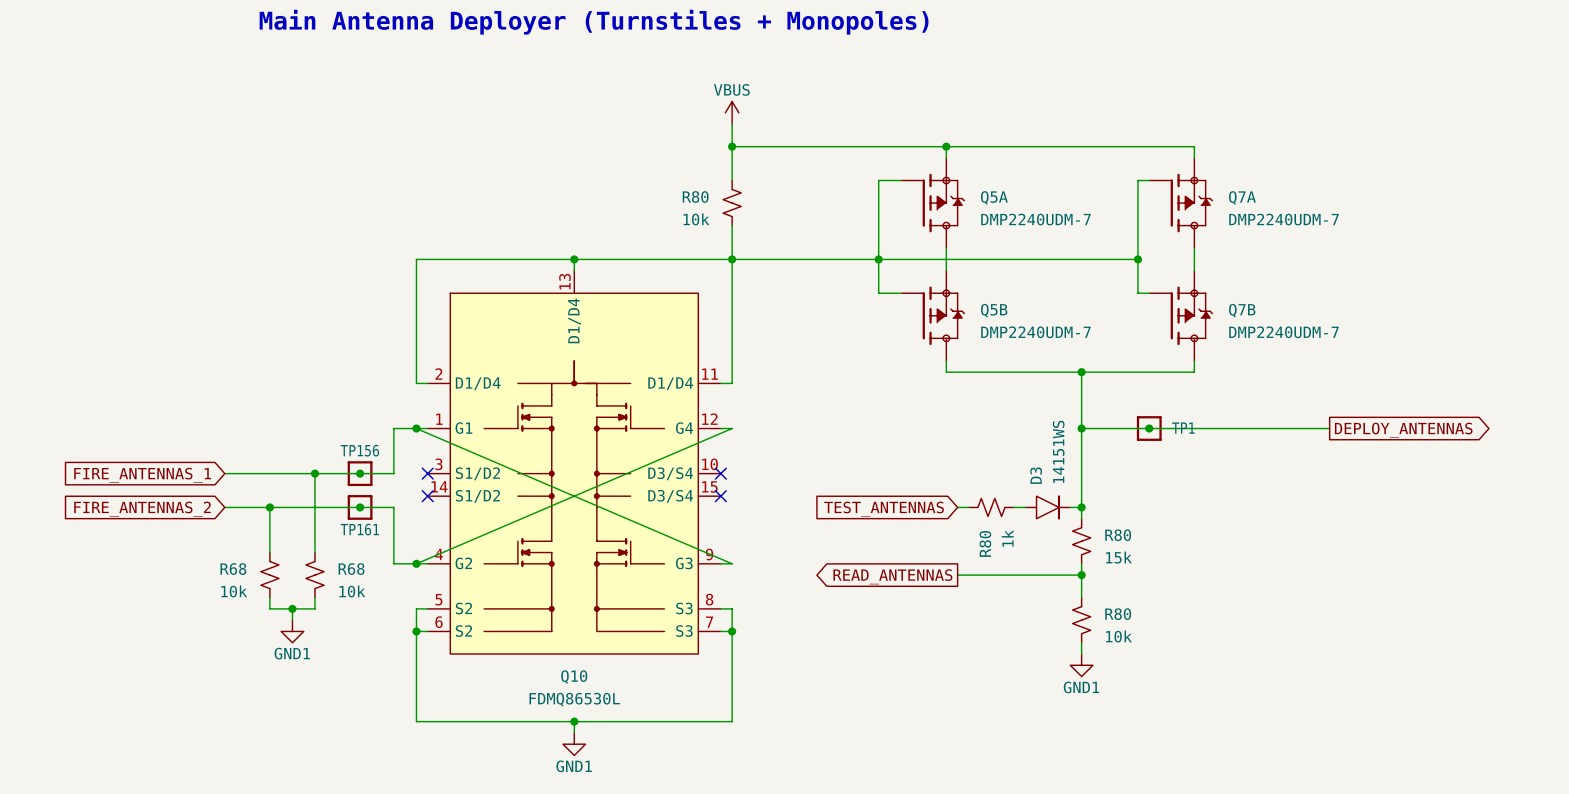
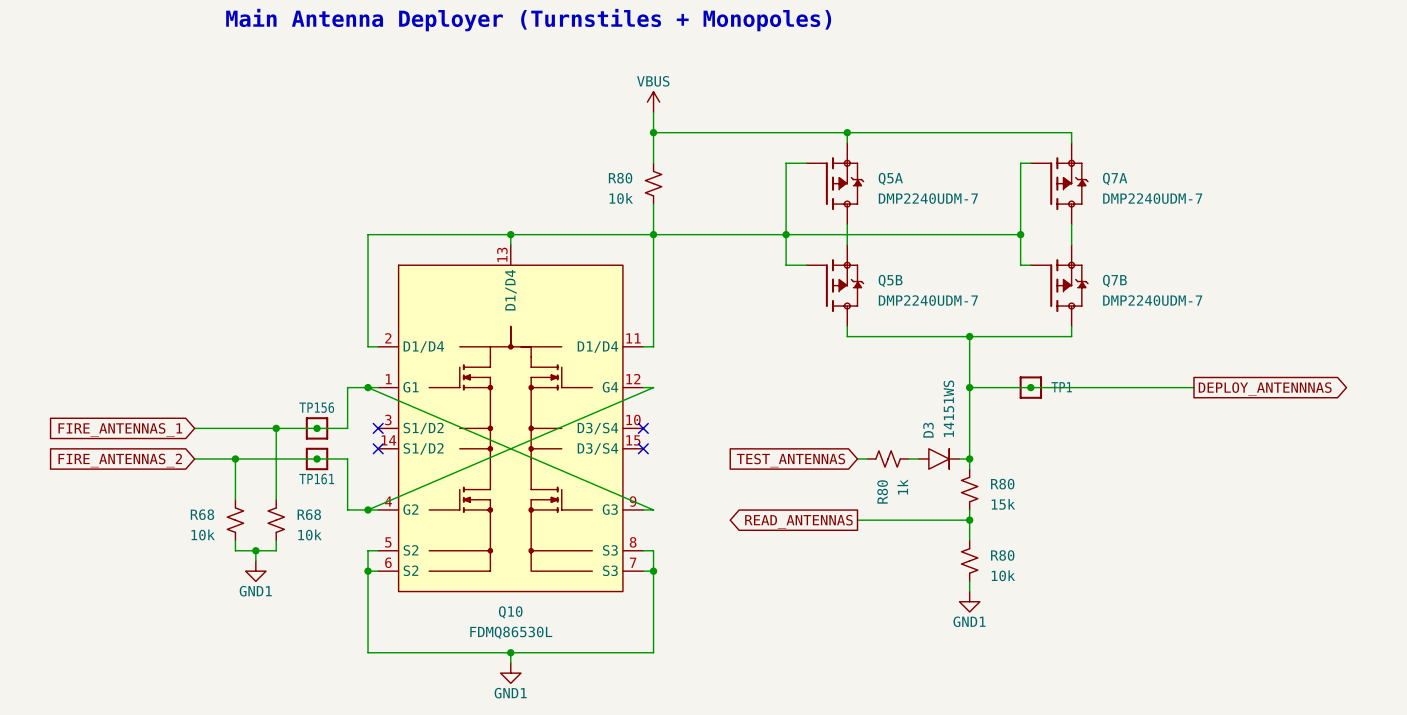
global label: DEPLOY_ANTENNAS (1403, 430) -> DEPLOY_ANTENNNAS (1265, 389)

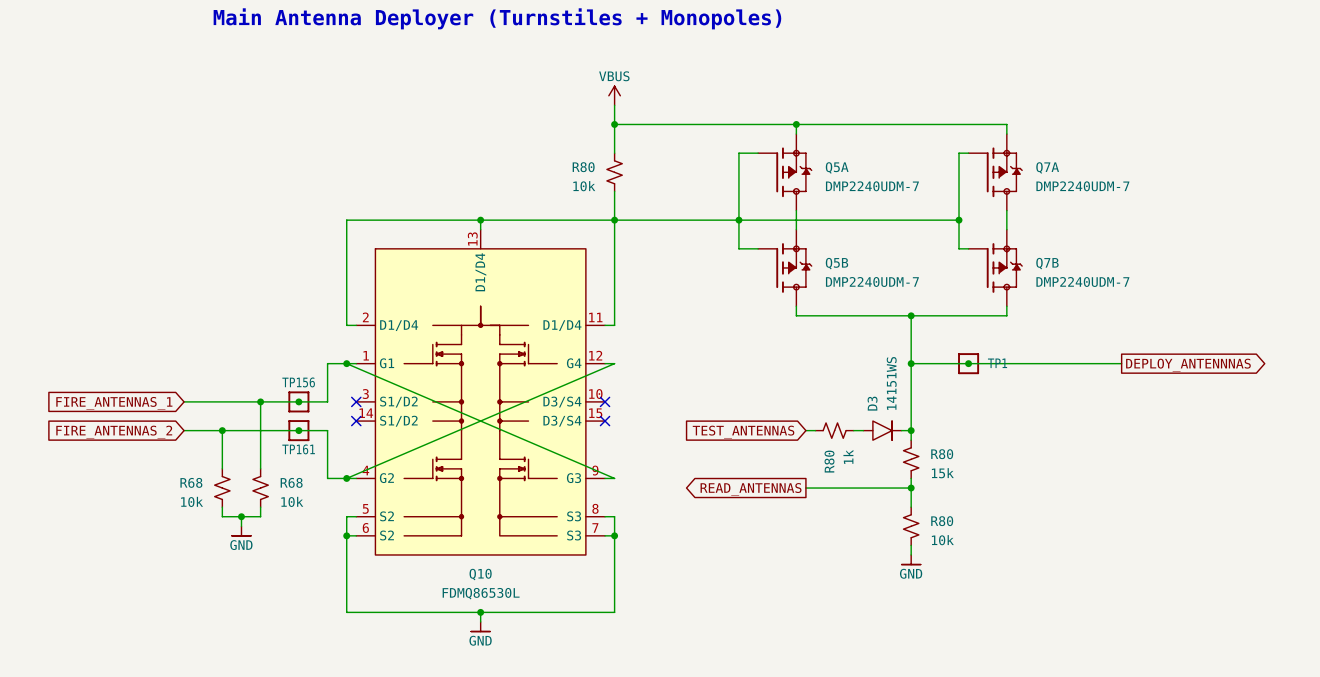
power symbol: GND1 (255, 571) -> GND (241, 531)
power symbol: GND1 (969, 601) -> GND (911, 559)
power symbol: GND1 (510, 673) -> GND (480, 626)

